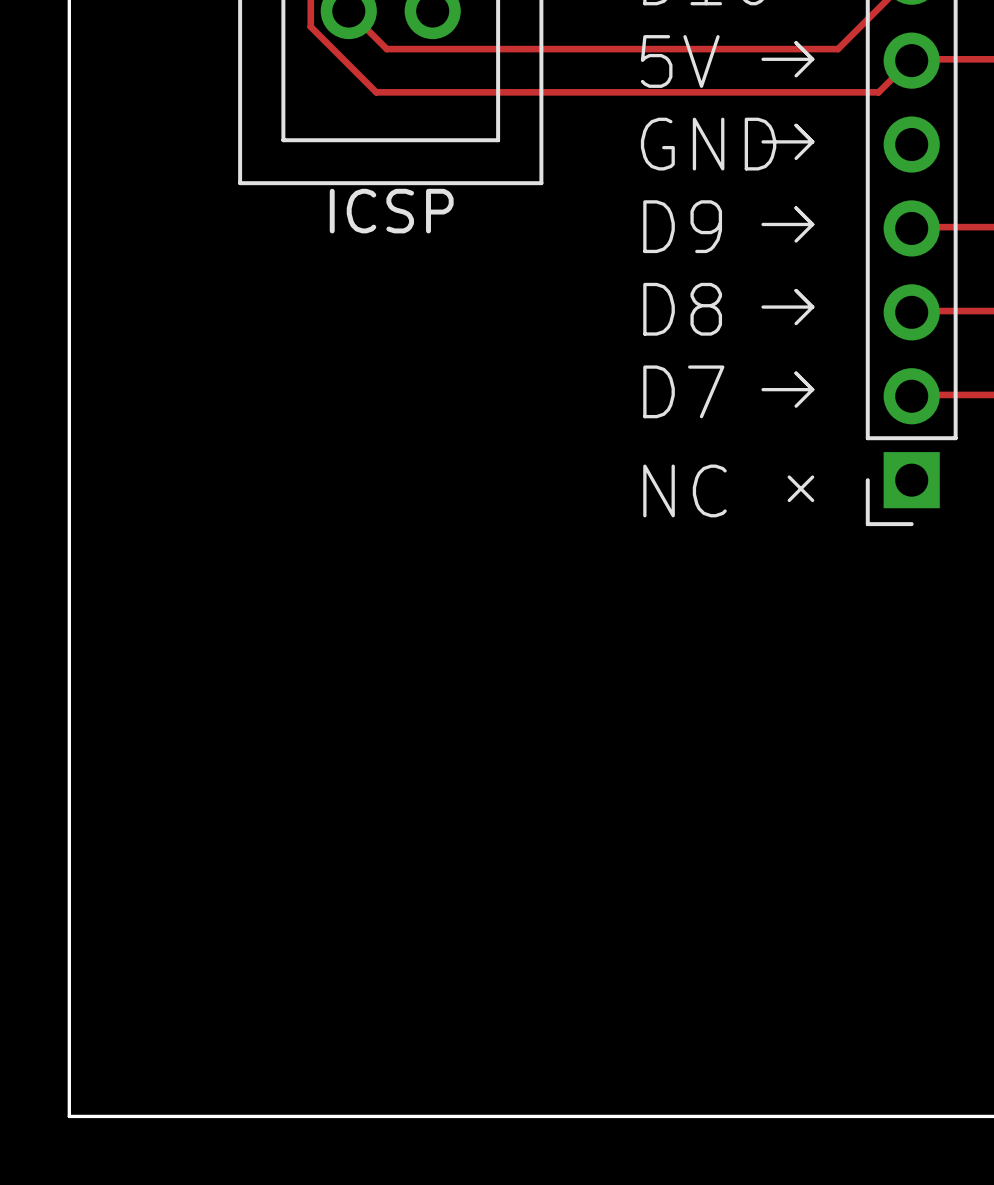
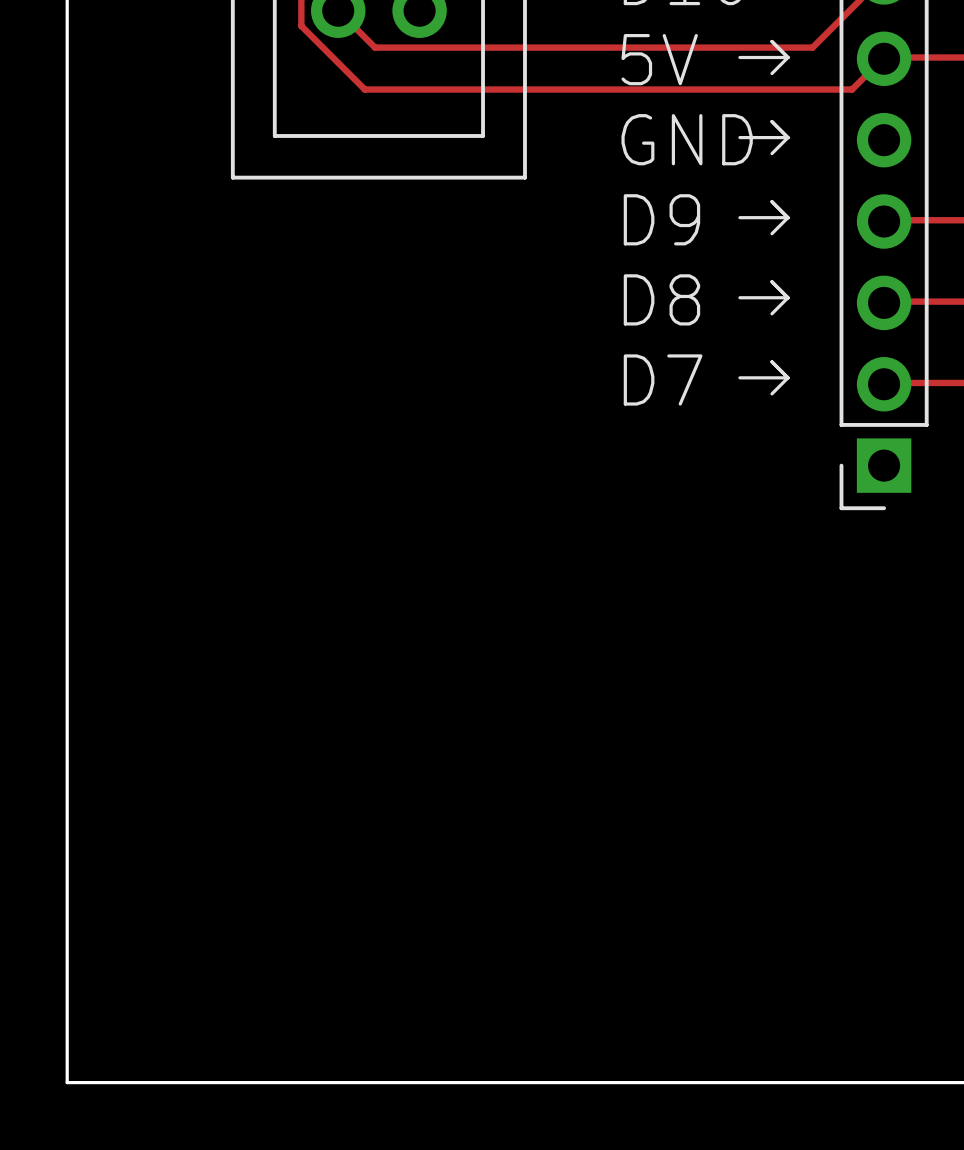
part value: ICSP (391, 211) -> none
line: (789, 477) (812, 500) -> none
line: (812, 477) (789, 500) -> none
text: NC (685, 490) -> none

